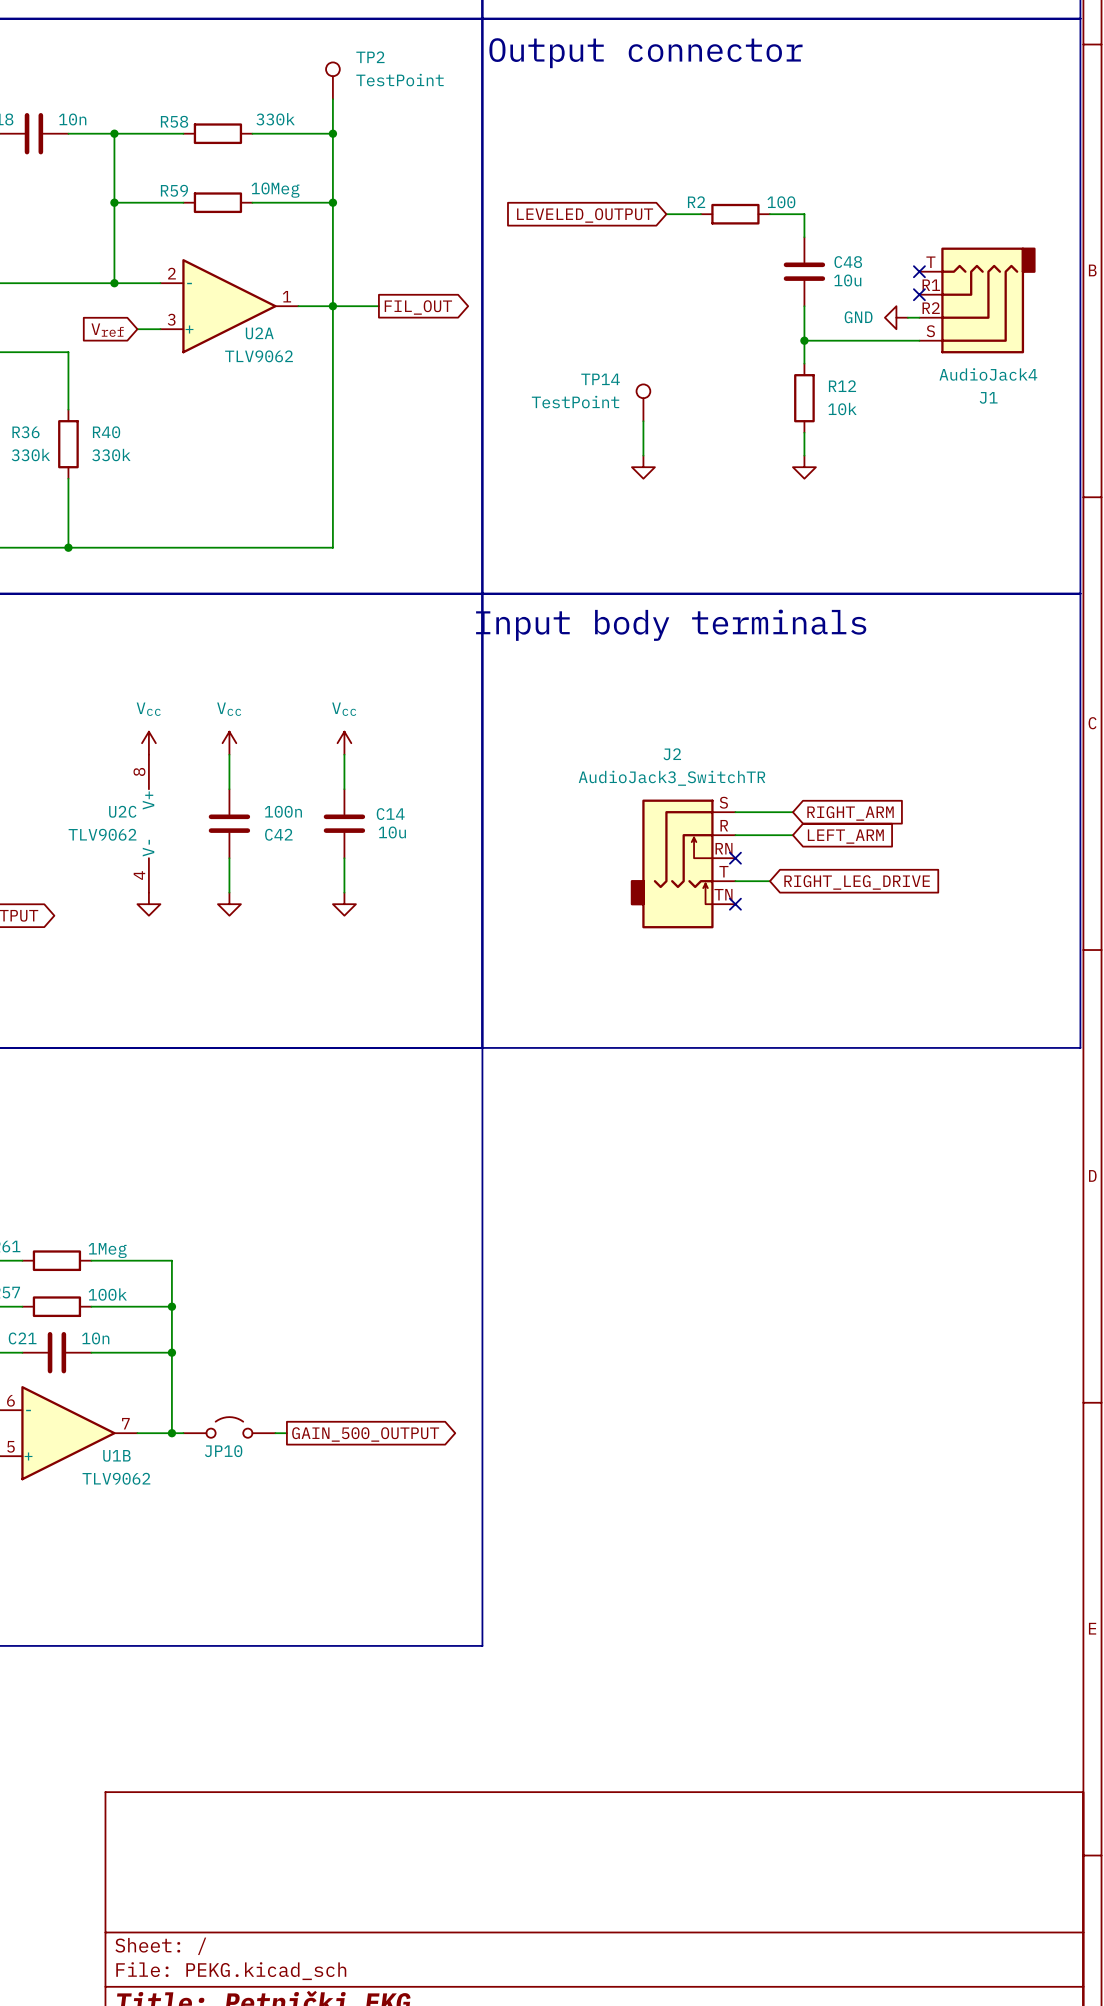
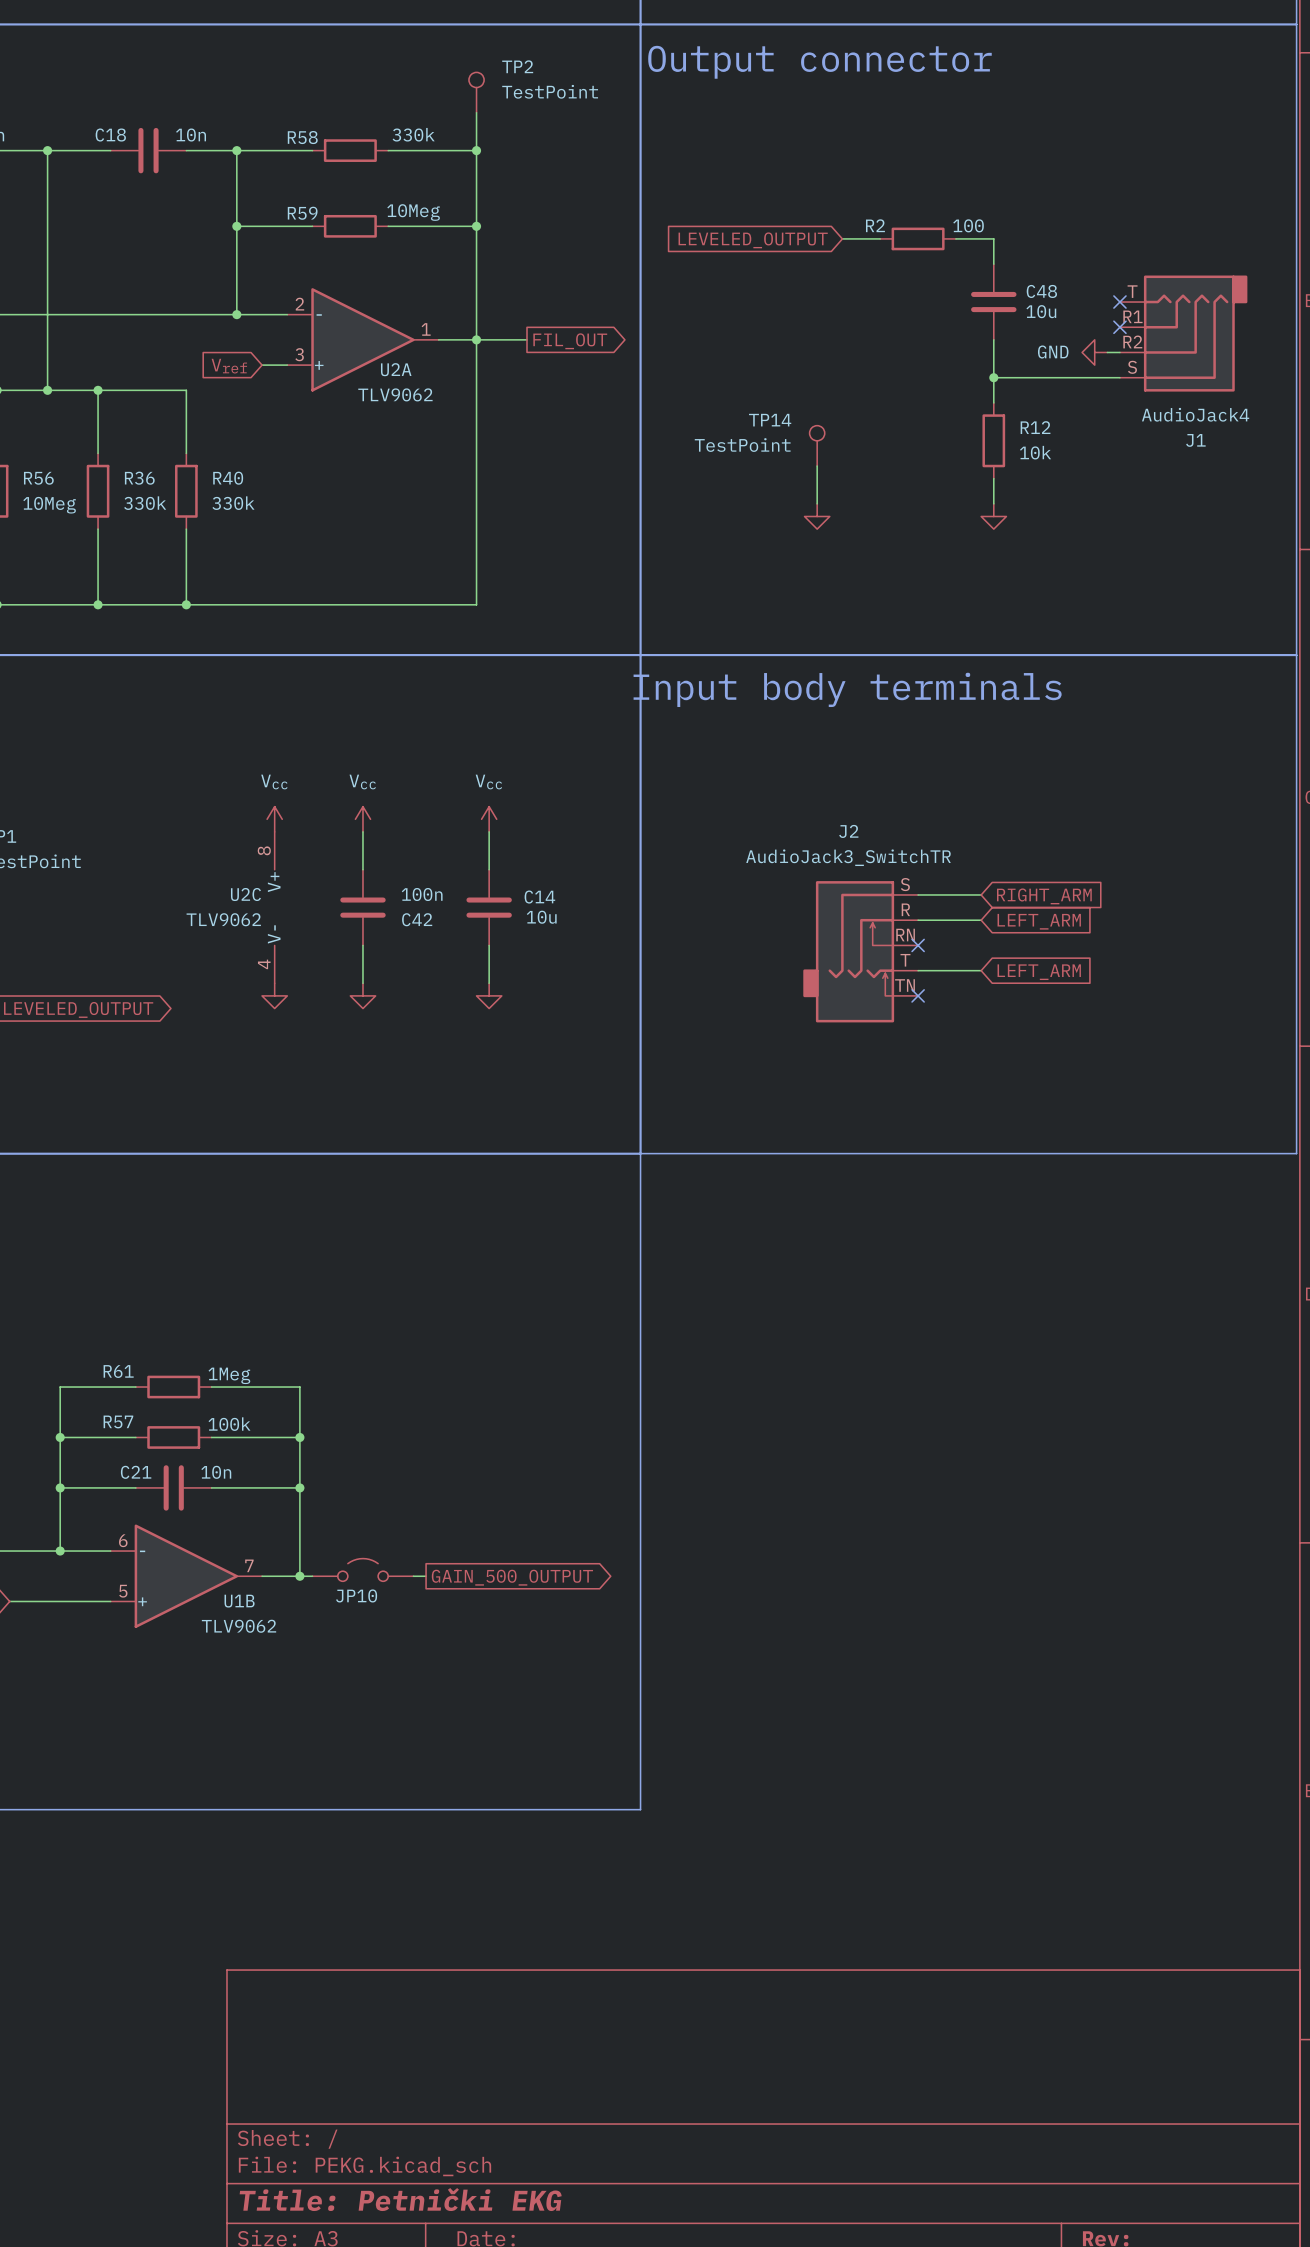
wire: none -> (955, 970) (981, 970)
global label: none -> LEFT_ARM (1039, 972)
global label: RIGHT_LEG_DRIVE (857, 882) -> none

